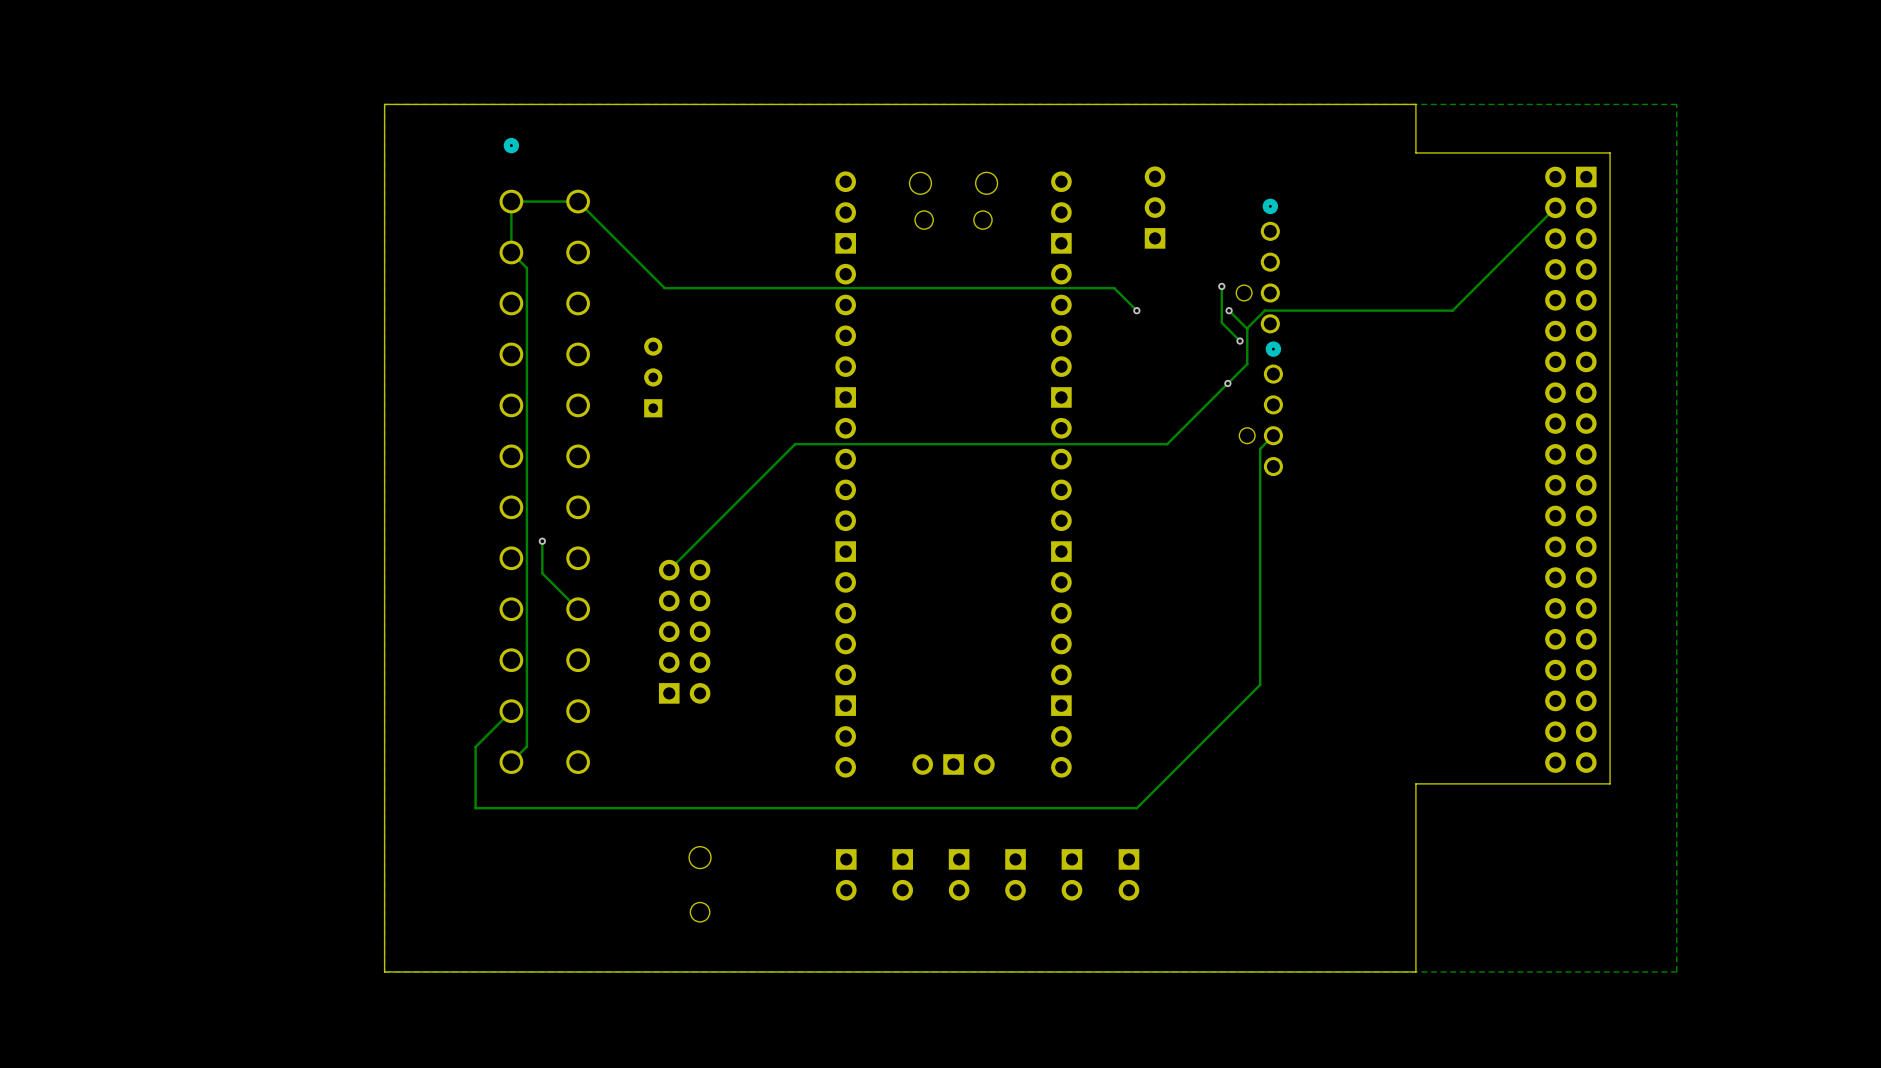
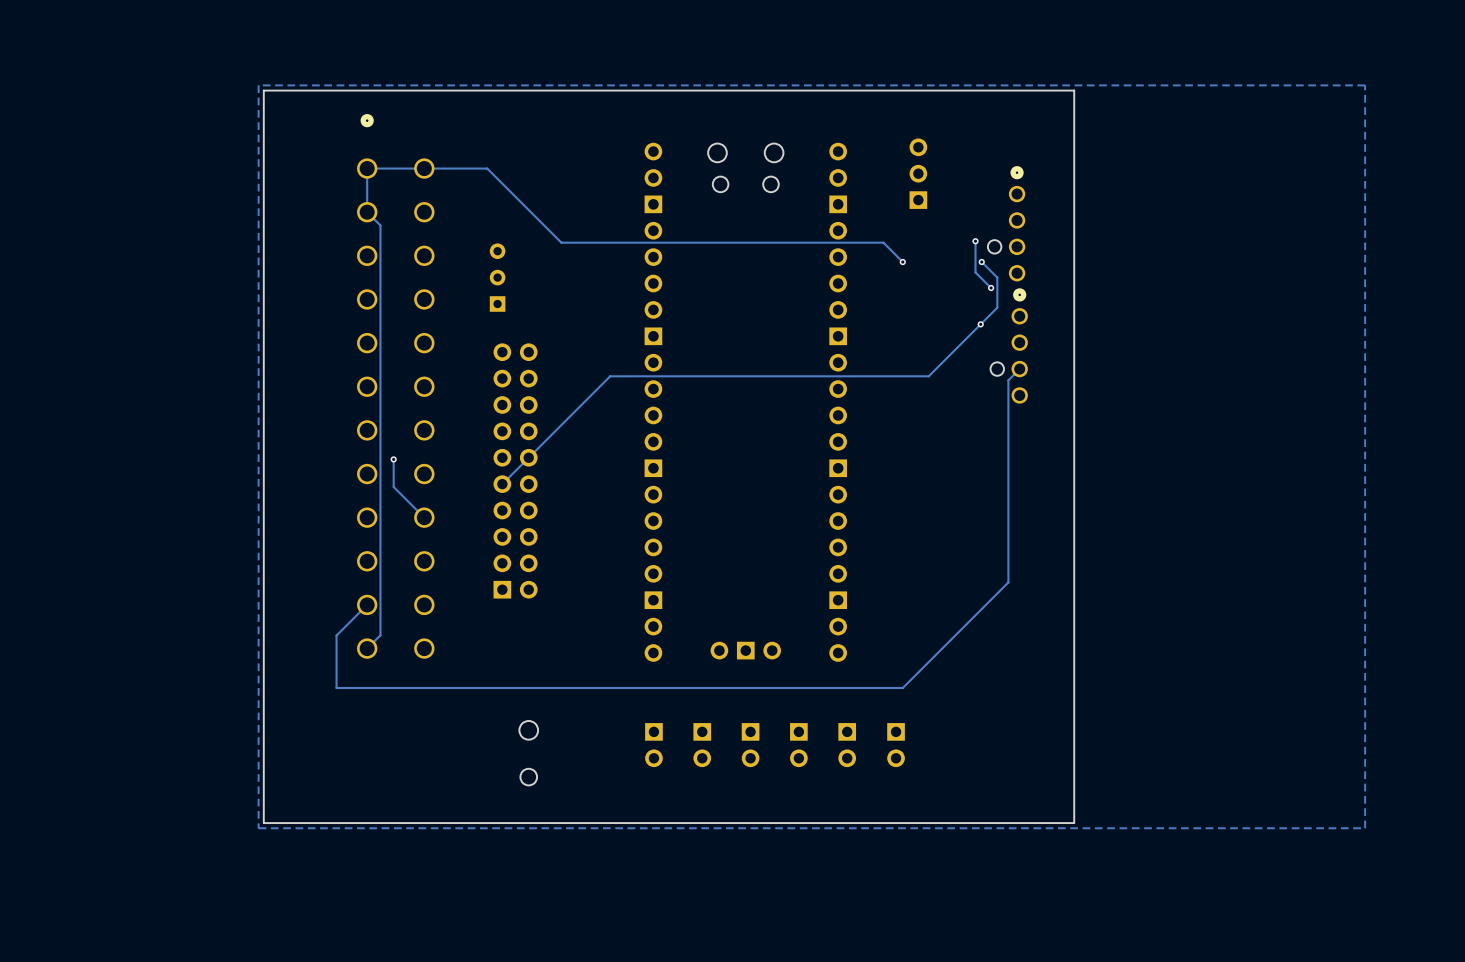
board edge: (1415, 104) (1415, 152) (1610, 152) (1610, 783) (1415, 783) (1415, 971) (384, 971) (384, 104) (1415, 104) -> (1074, 90) (1074, 823) (263, 823) (263, 90) (1074, 90)
track: (578, 201) (664, 288) (738, 288) -> (424, 168) (487, 168) (561, 242)
track: (1555, 207) (1452, 310) (1264, 310) (1247, 328) -> none
part position: (653, 377) -> (497, 277)
part: (1570, 469) -> none
part: none -> (515, 470)

